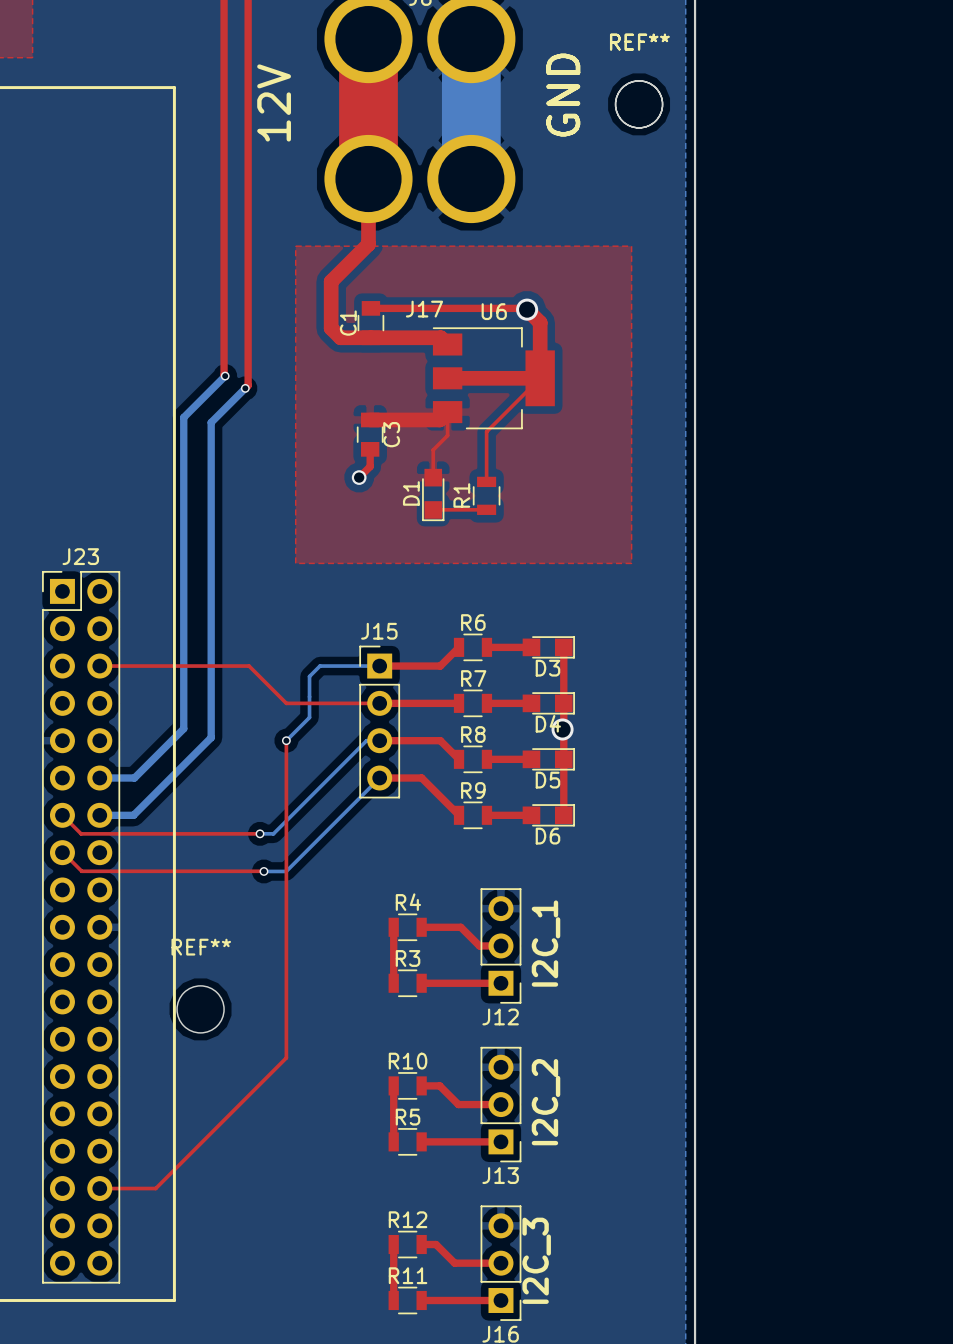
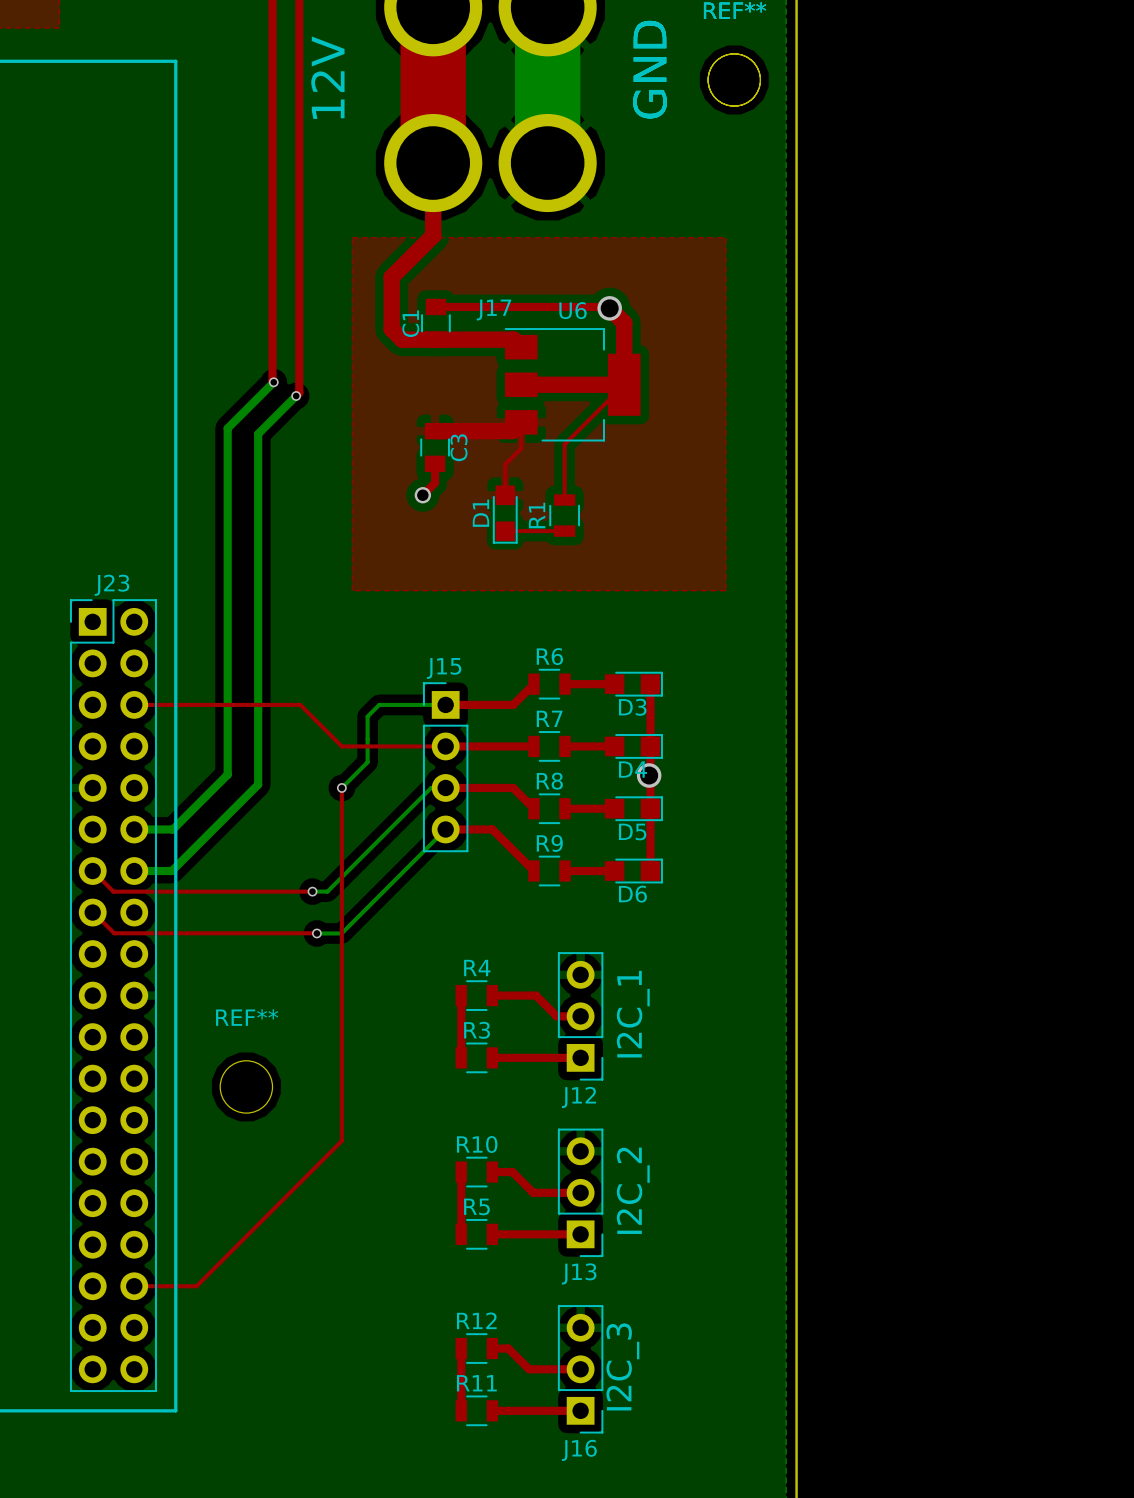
line: (137, 87) (174, 87) (174, 1300) (137, 1300) -> (175, 61) (175, 1410)

